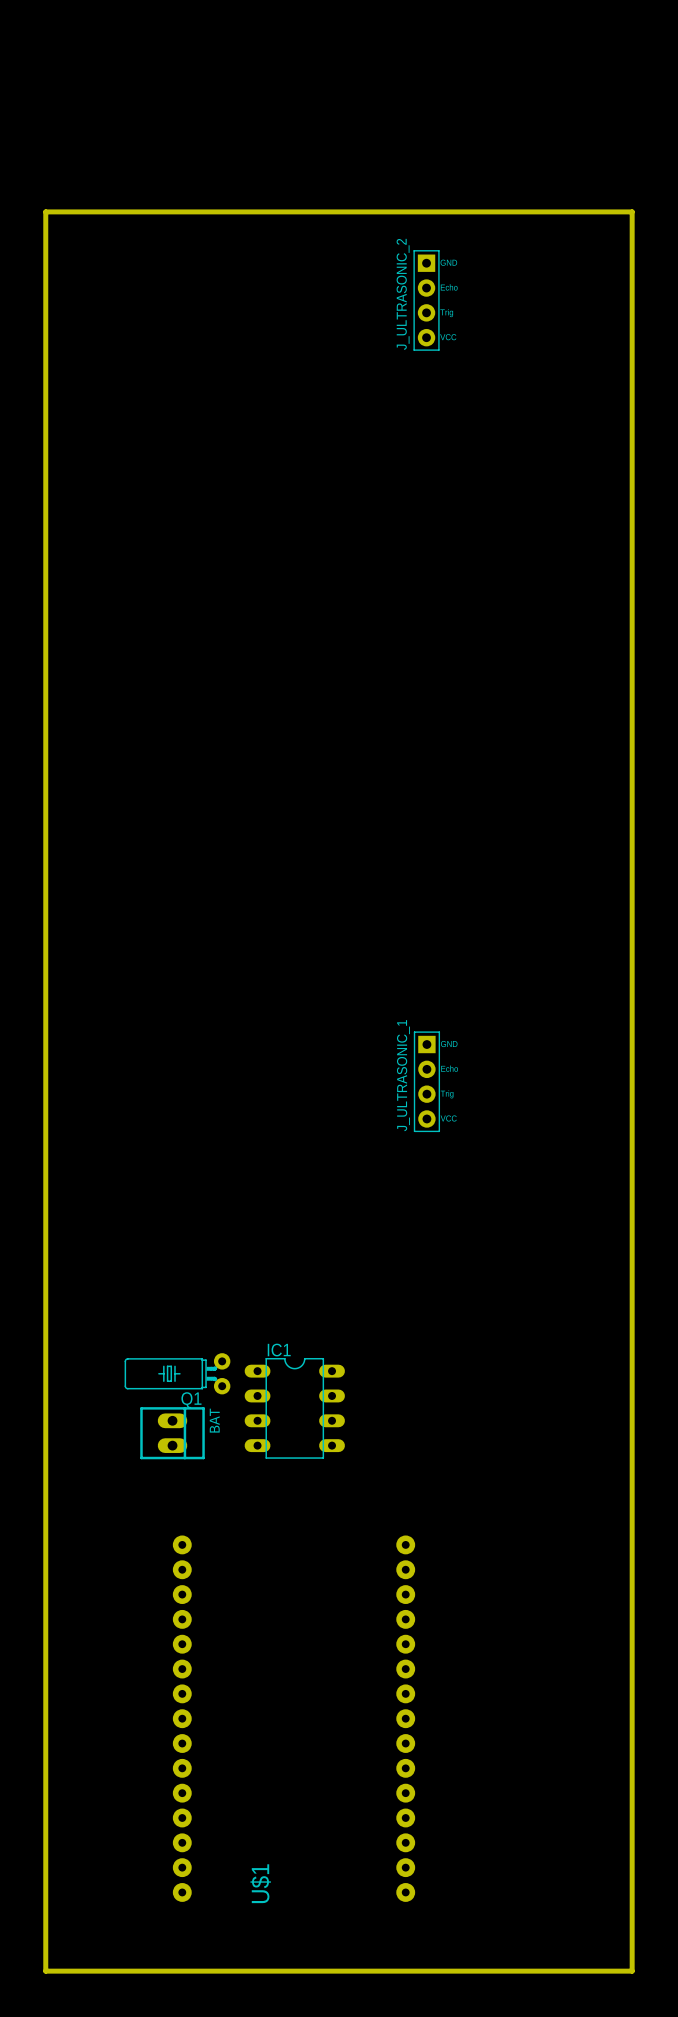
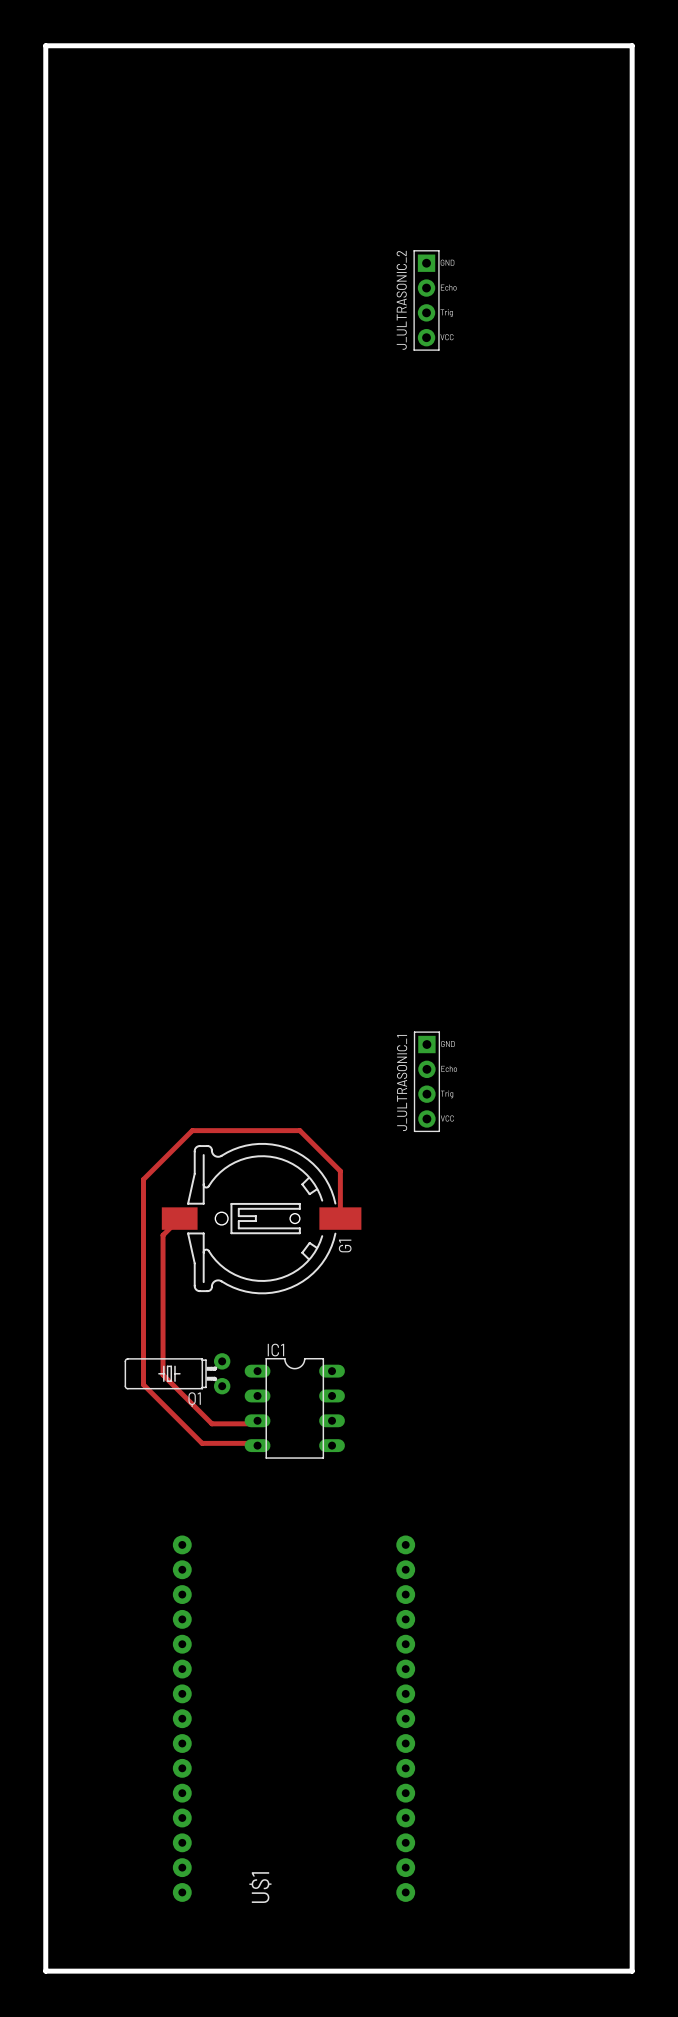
board edge: (45, 211) (632, 211) -> (45, 211) (45, 45) (632, 45) (632, 211)
track: none -> (179, 1218) (163, 1235) (163, 1374) (211, 1423) (254, 1423) (257, 1420)
G1: none -> (261, 1218)
track: none -> (340, 1218) (340, 1171) (299, 1130) (192, 1130) (143, 1179) (143, 1384) (202, 1443) (255, 1443) (257, 1445)
BAT: (172, 1433) -> none

